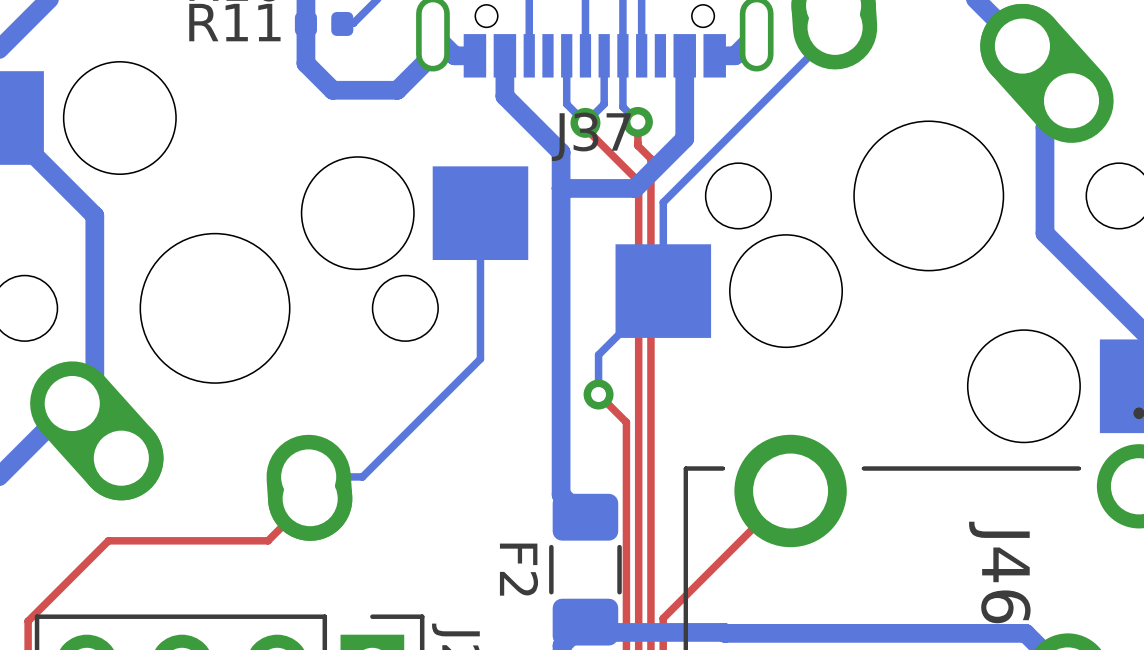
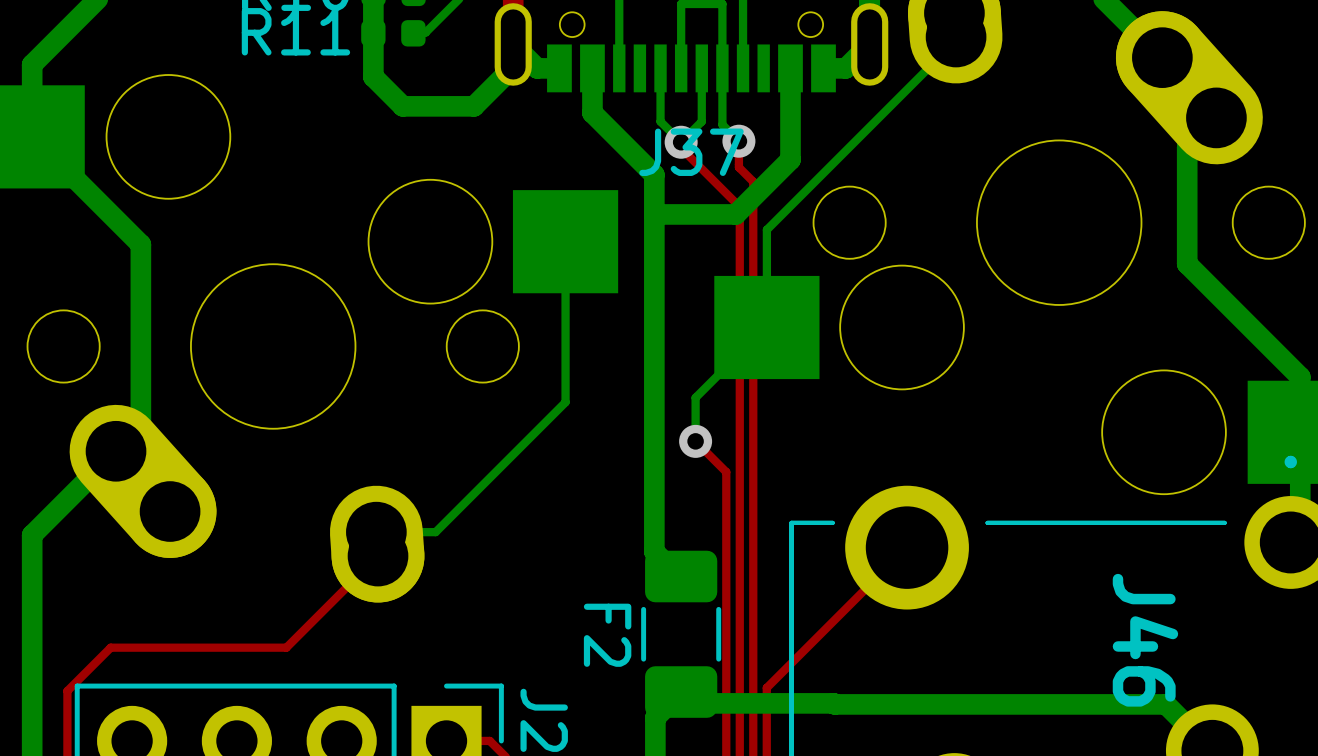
top track: (268, 540) (108, 540) (67, 581) -> (331, 602) (286, 647) (110, 647)

